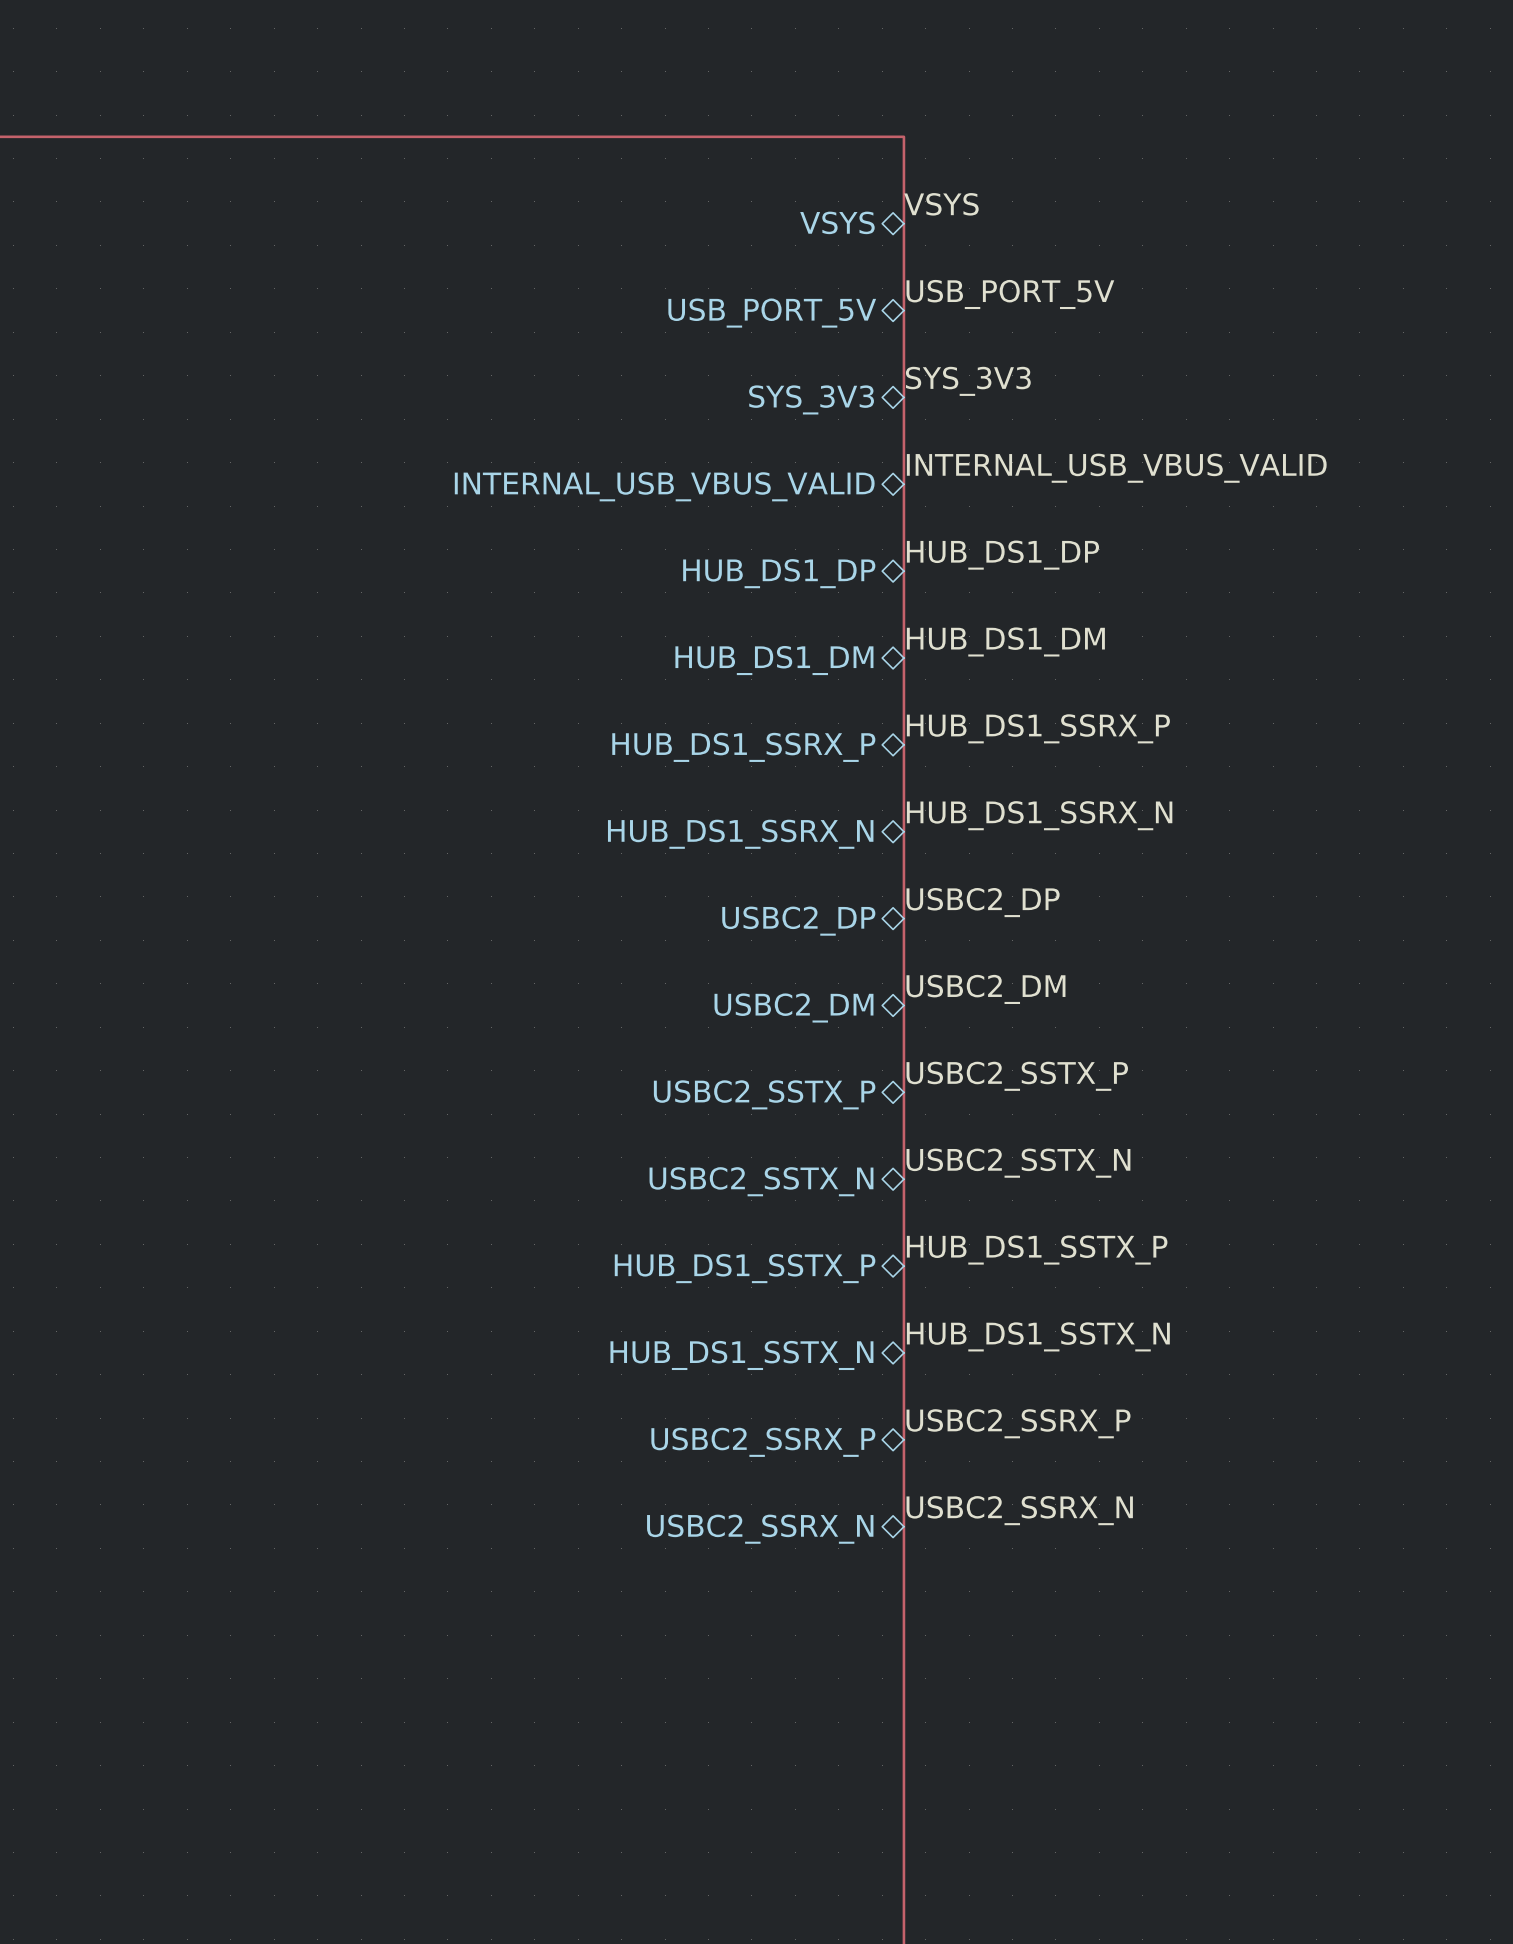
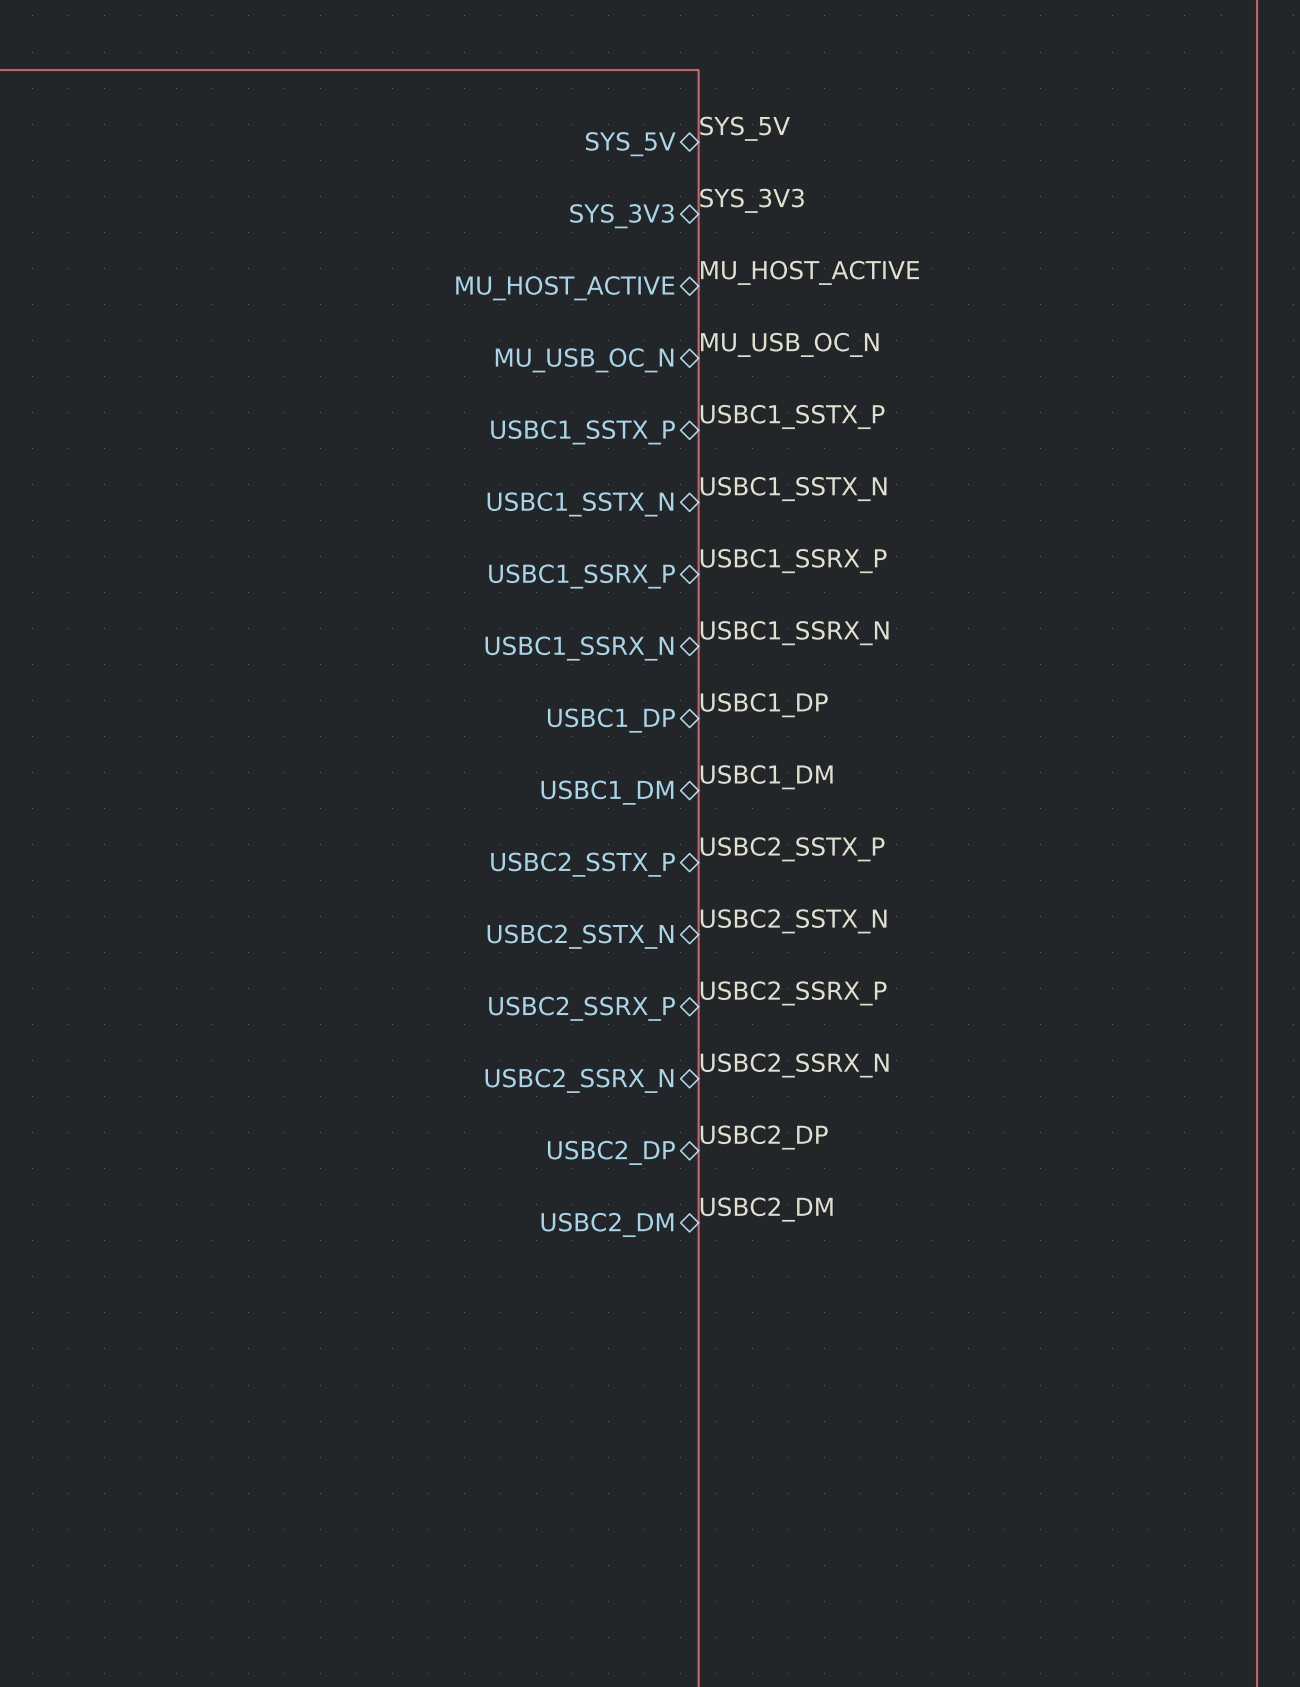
label: VSYS (941, 204) -> SYS_5V (745, 128)
sheet pin: VSYS (837, 222) -> SYS_5V (630, 144)
label: USB_PORT_5V (1010, 294) -> SYS_3V3 (752, 200)
sheet pin: USB_PORT_5V (772, 313) -> SYS_3V3 (622, 216)
label: SYS_3V3 (968, 381) -> MU_HOST_ACTIVE (810, 272)
sheet pin: SYS_3V3 (811, 399) -> MU_HOST_ACTIVE (565, 288)
label: INTERNAL_USB_VBUS_VALID (1116, 468) -> MU_USB_OC_N (789, 344)
sheet pin: INTERNAL_USB_VBUS_VALID (664, 486) -> MU_USB_OC_N (584, 360)
label: HUB_DS1_DP (1002, 555) -> USBC1_SSTX_P (792, 416)
sheet pin: HUB_DS1_DP (779, 573) -> USBC1_SSTX_P (583, 432)
label: HUB_DS1_DM (1005, 641) -> USBC1_SSTX_N (793, 489)
sheet pin: HUB_DS1_DM (774, 660) -> USBC1_SSTX_N (580, 504)
label: HUB_DS1_SSRX_P (1038, 728) -> USBC1_SSRX_P (793, 561)
sheet pin: HUB_DS1_SSRX_P (743, 747) -> USBC1_SSRX_P (582, 576)
label: HUB_DS1_SSRX_N (1039, 815) -> USBC1_SSRX_N (794, 633)
sheet pin: HUB_DS1_SSRX_N (740, 834) -> USBC1_SSRX_N (579, 648)
label: USBC2_DP (983, 902) -> USBC1_DP (764, 705)
sheet pin: USBC2_DP (798, 921) -> USBC1_DP (611, 720)
label: USBC2_DM (985, 989) -> USBC1_DM (766, 777)
sheet pin: USBC2_DM (793, 1007) -> USBC1_DM (607, 792)
label: HUB_DS1_SSTX_P (1037, 1250) -> USBC2_SSRX_P (793, 993)
sheet pin: HUB_DS1_SSTX_P (745, 1268) -> USBC2_SSRX_P (582, 1008)
label: HUB_DS1_SSTX_N (1038, 1336) -> USBC2_SSRX_N (794, 1065)
sheet pin: HUB_DS1_SSTX_N (741, 1355) -> USBC2_SSRX_N (579, 1080)
label: USBC2_SSRX_P (1018, 1423) -> USBC2_DP (764, 1137)
sheet pin: USBC2_SSRX_P (763, 1442) -> USBC2_DP (611, 1152)
label: USBC2_SSRX_N (1019, 1510) -> USBC2_DM (766, 1209)
sheet pin: USBC2_SSRX_N (760, 1529) -> USBC2_DM (607, 1224)

